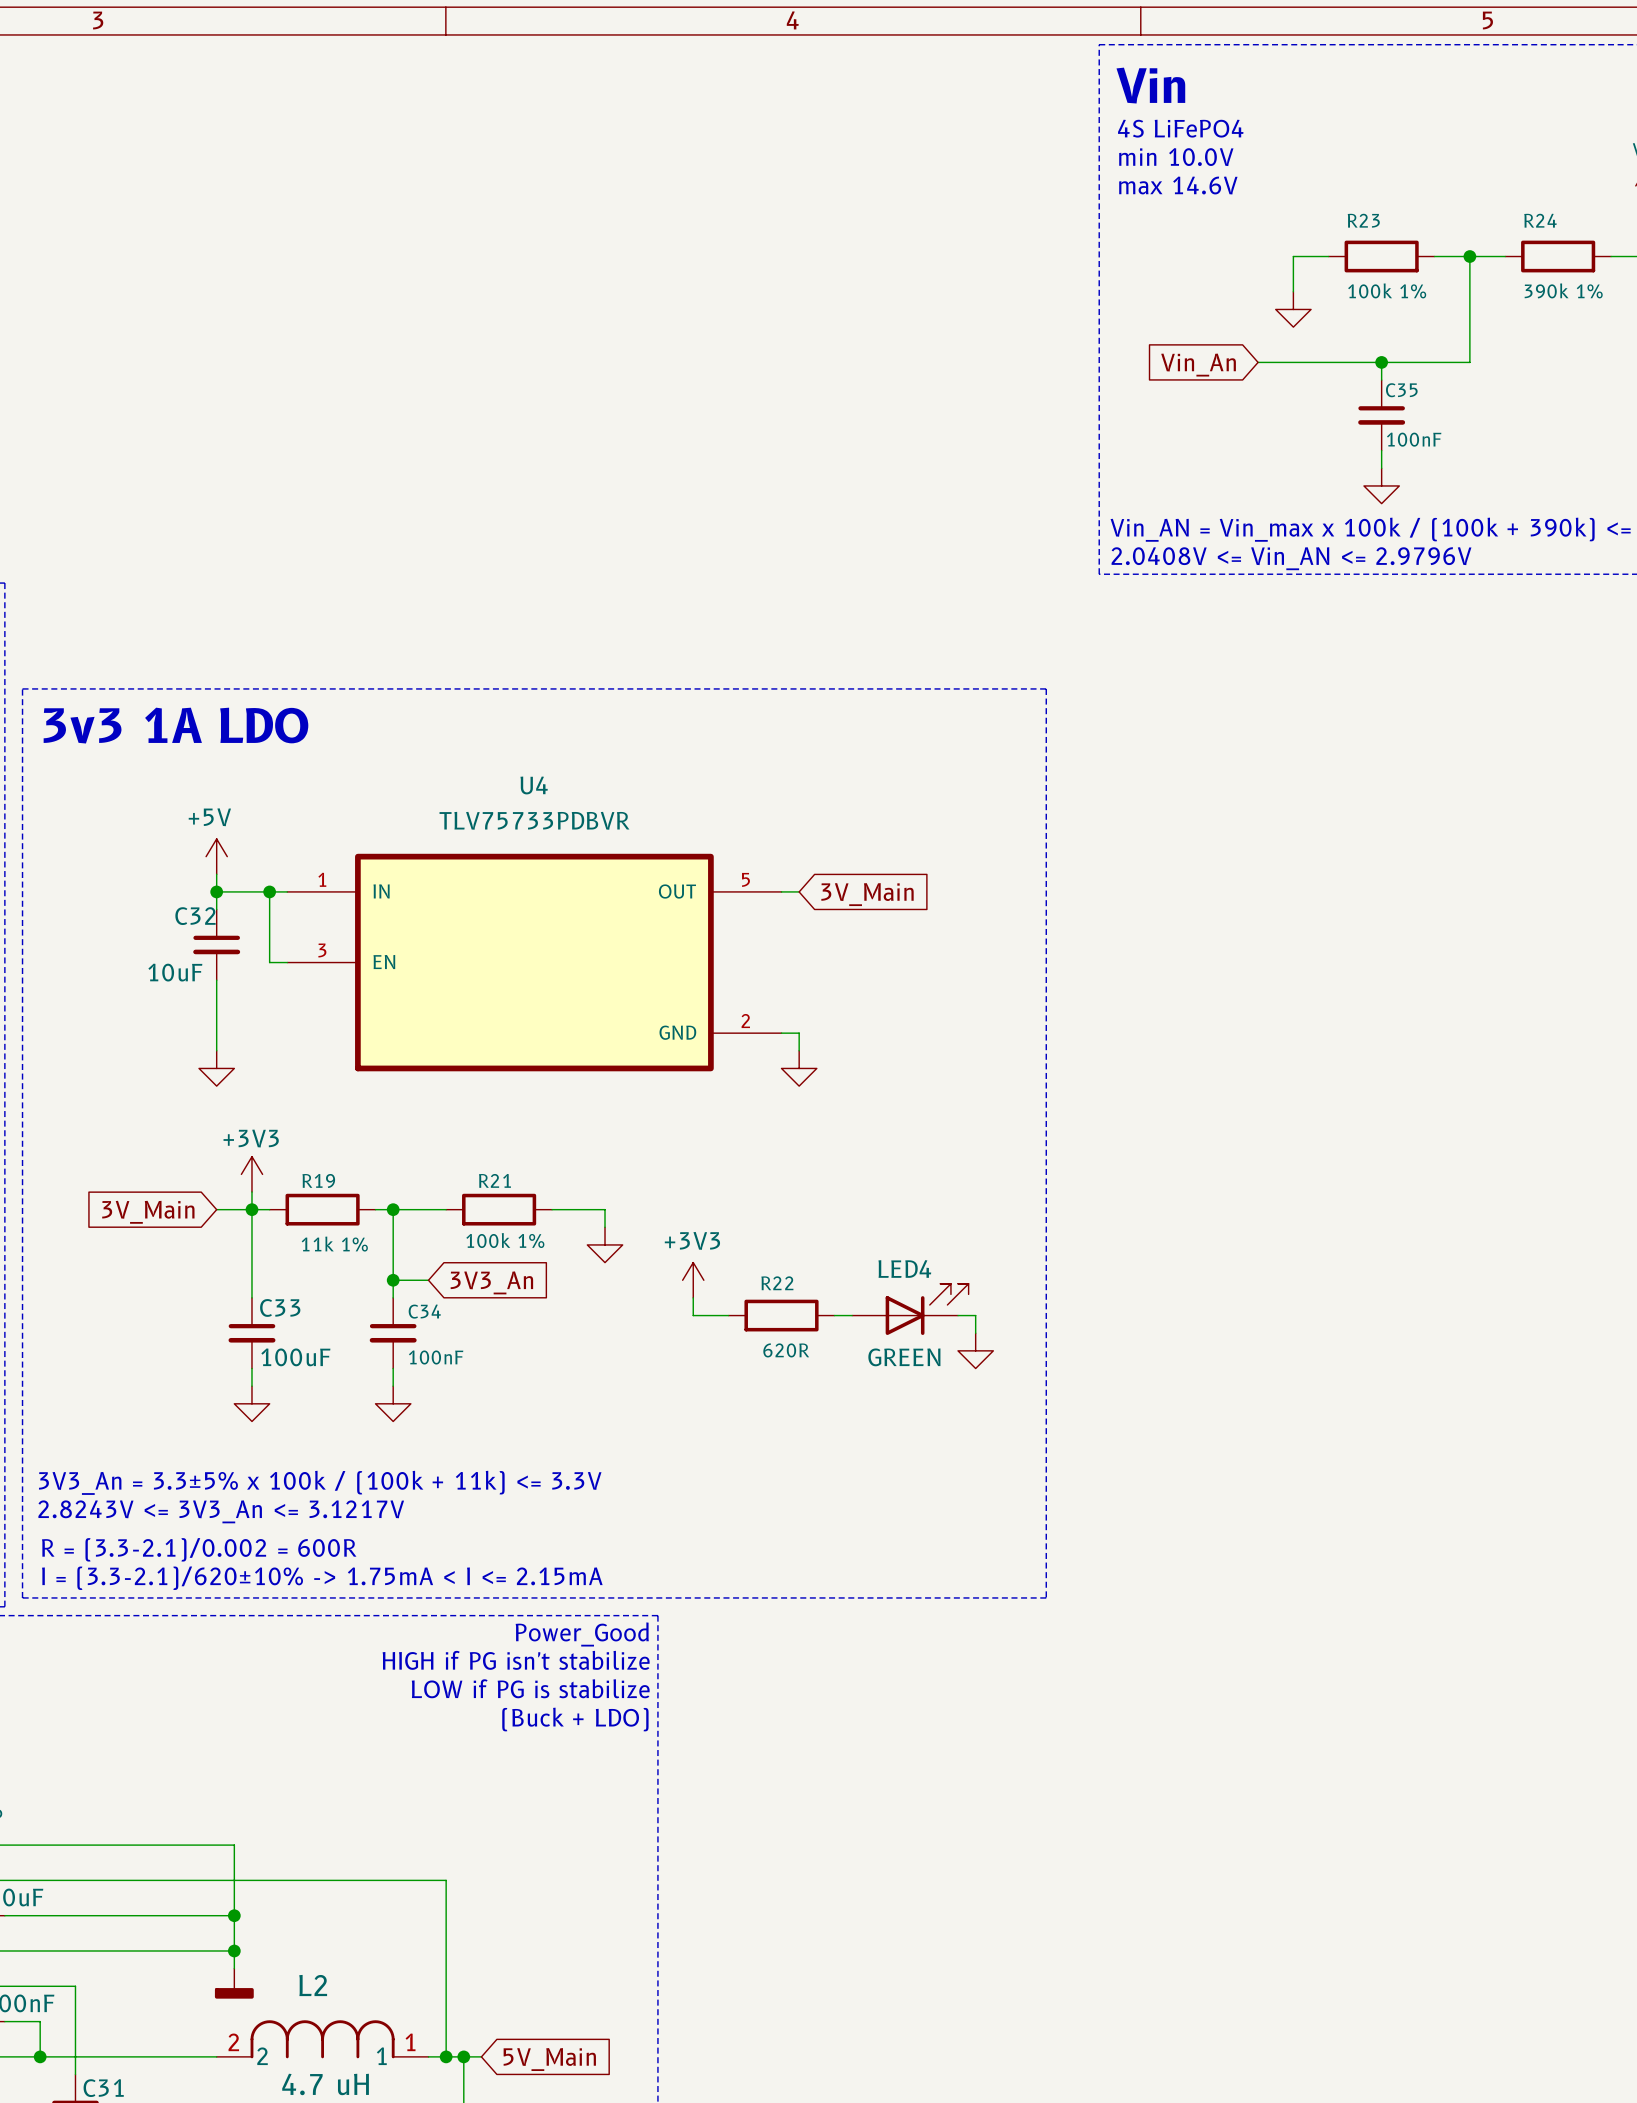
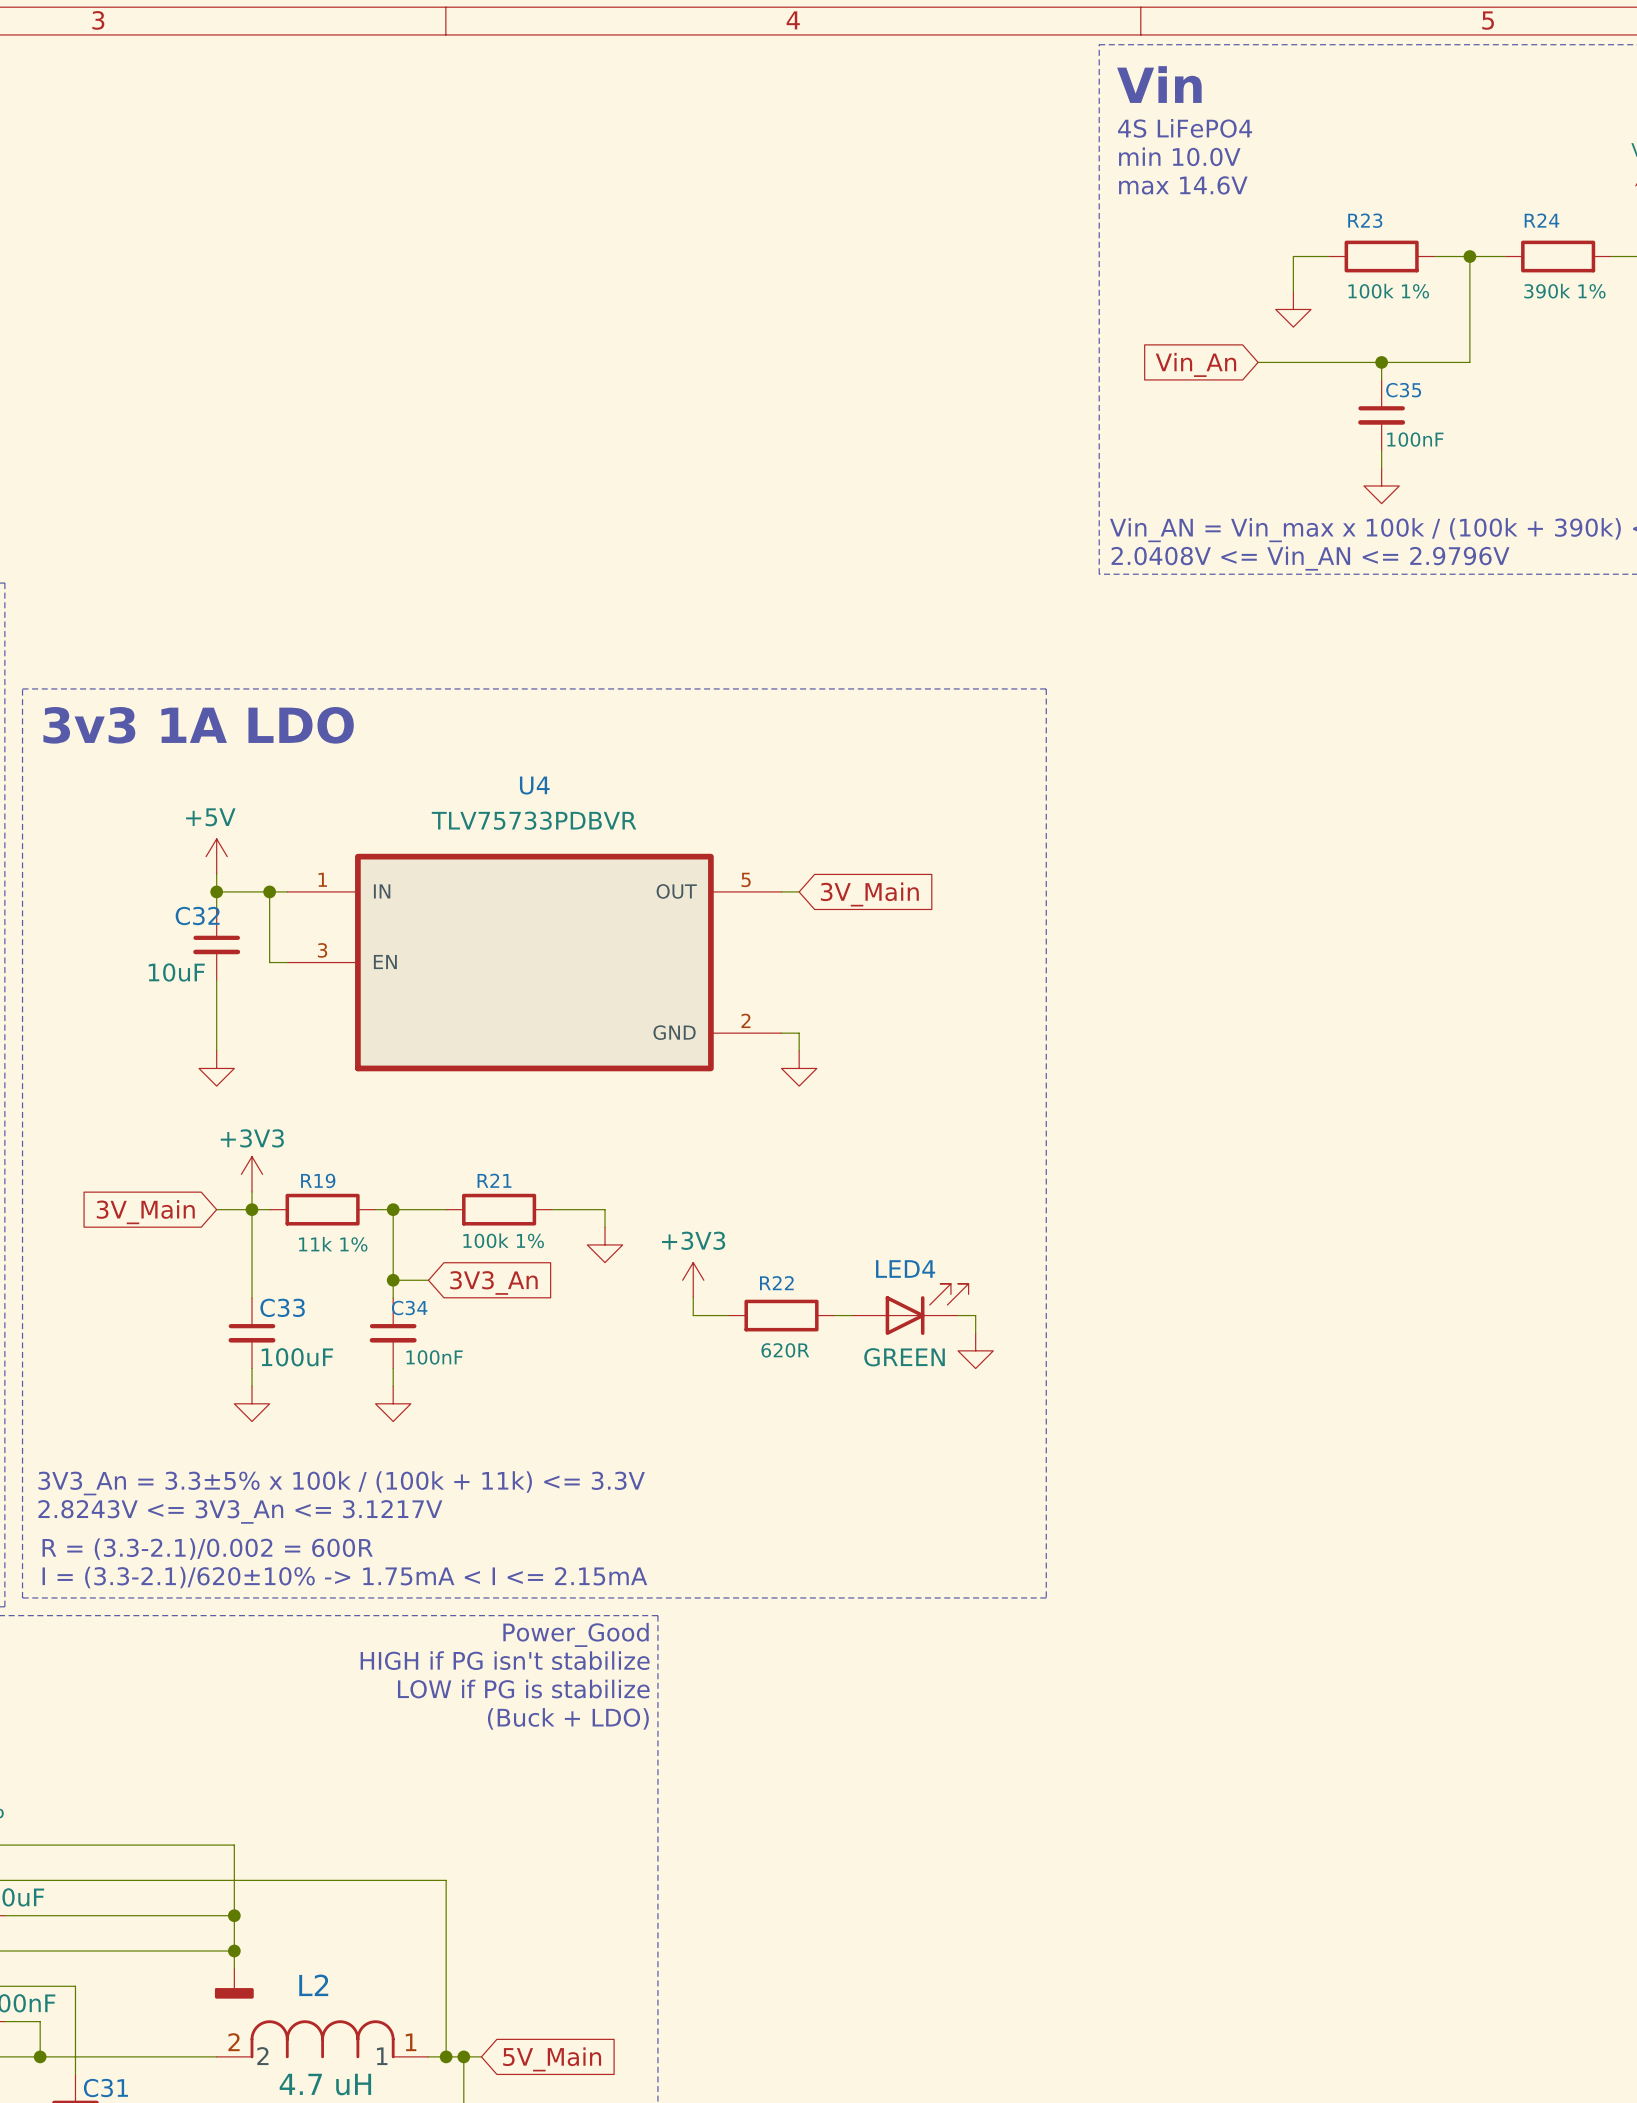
C34 name position: C34 (424, 1311) -> C34 (409, 1307)

